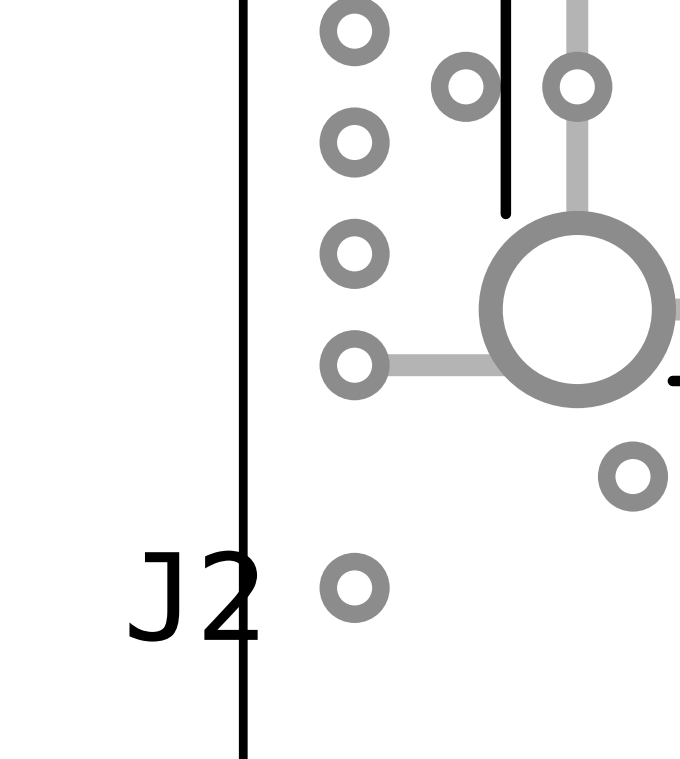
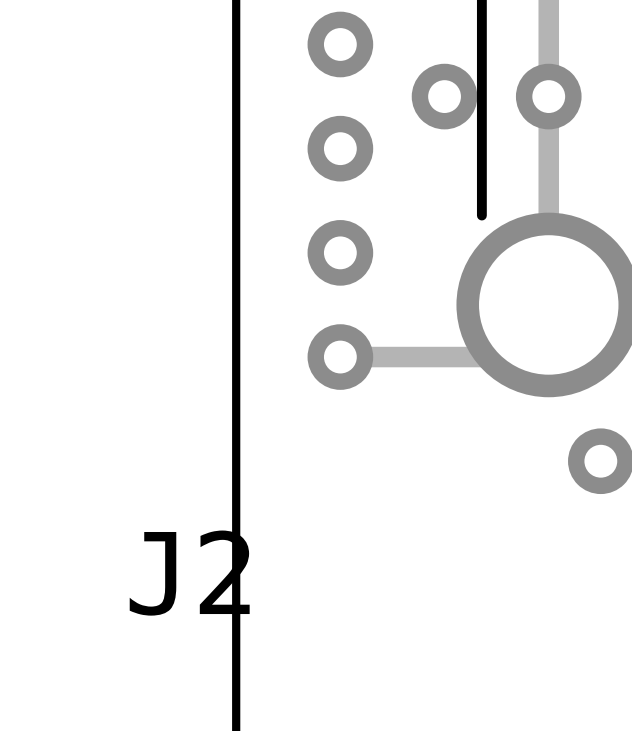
via: (354, 587) -> none

